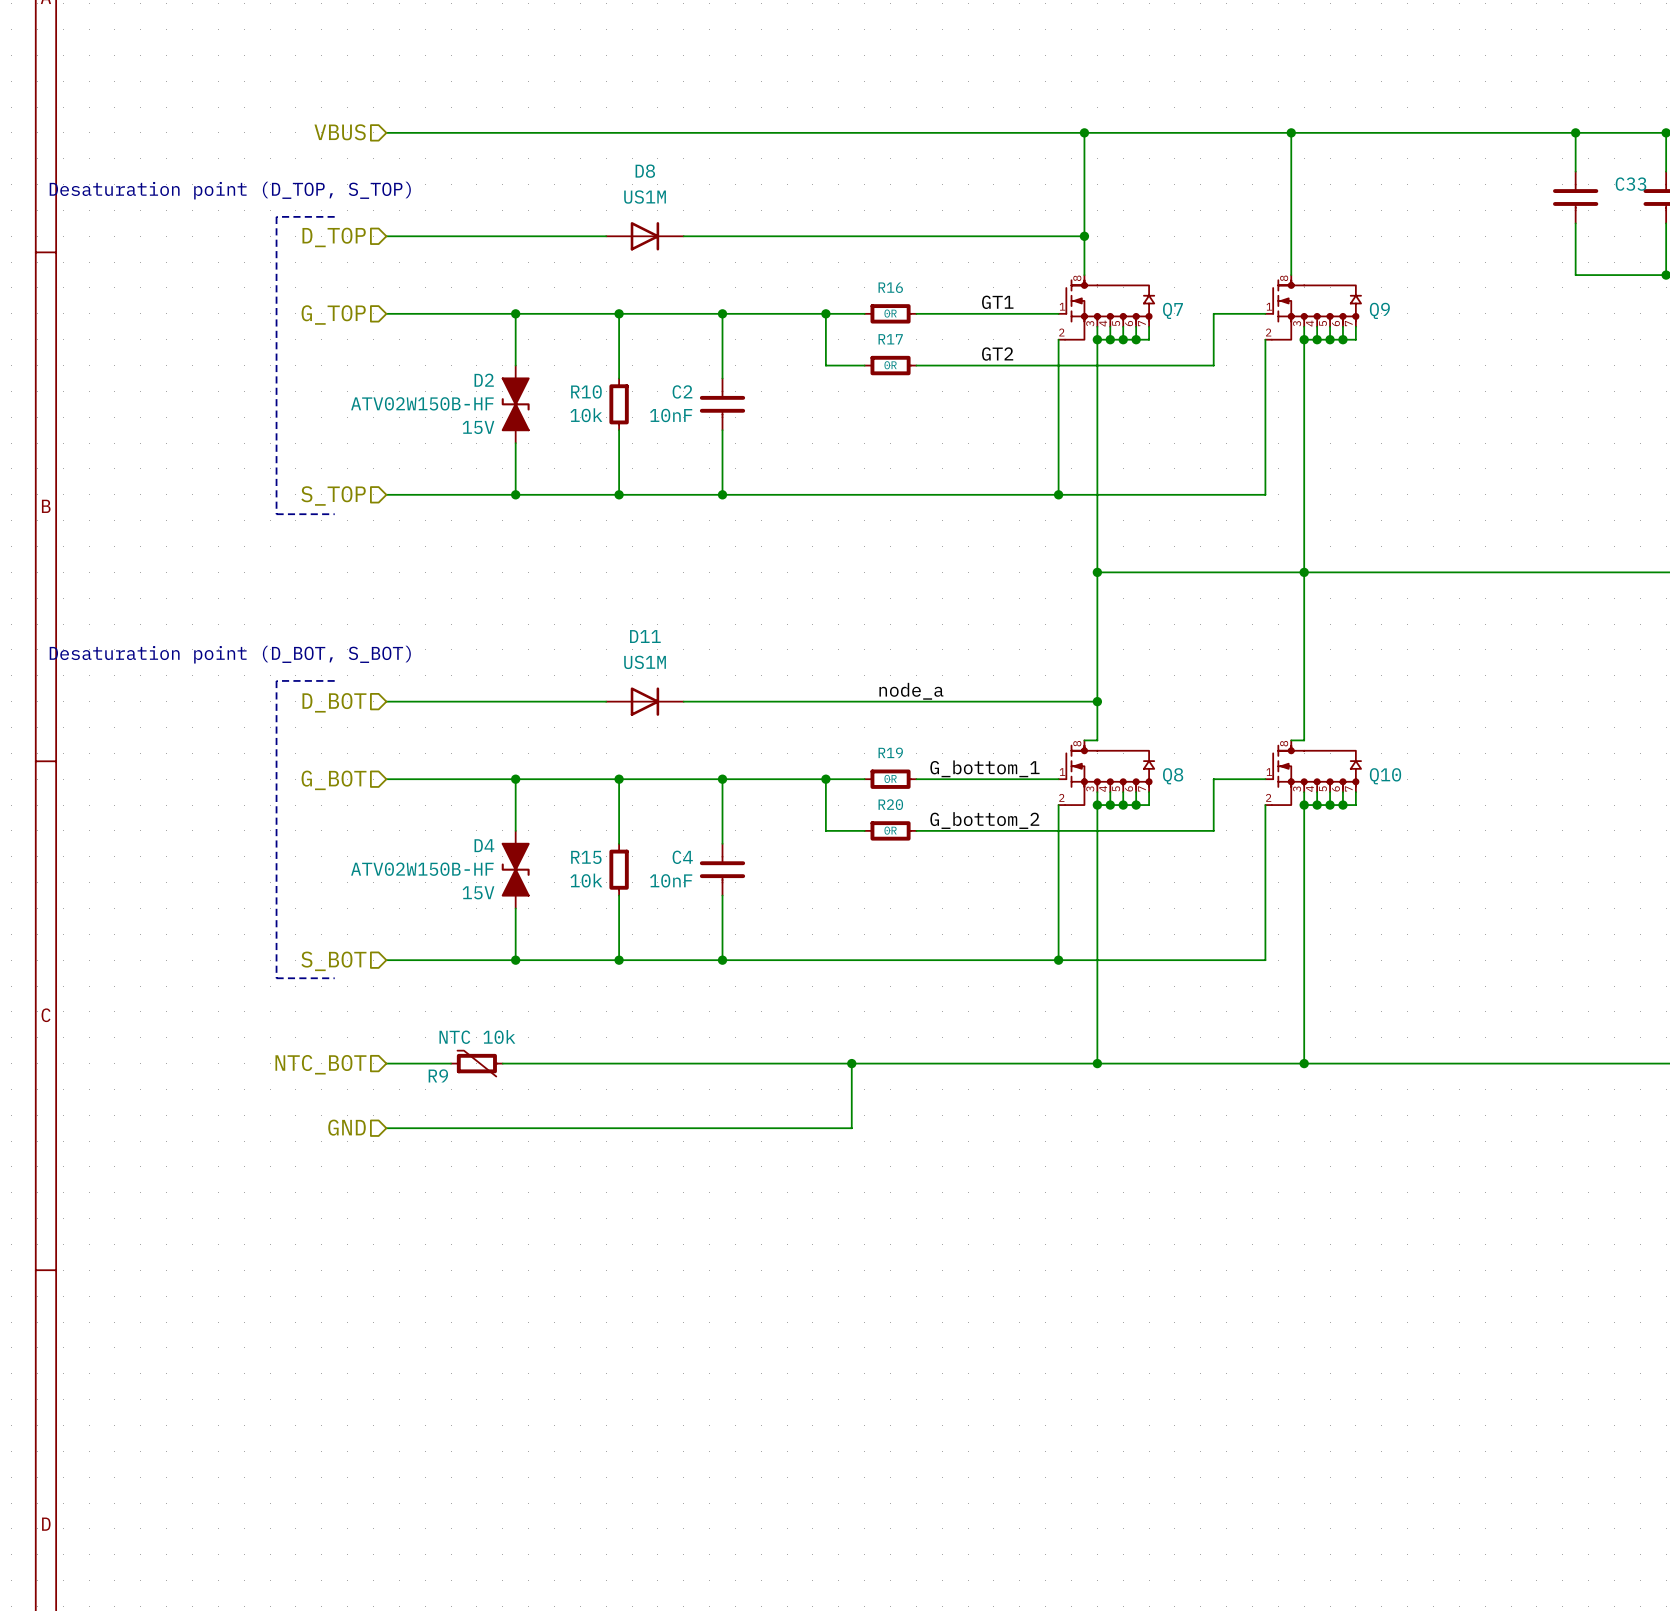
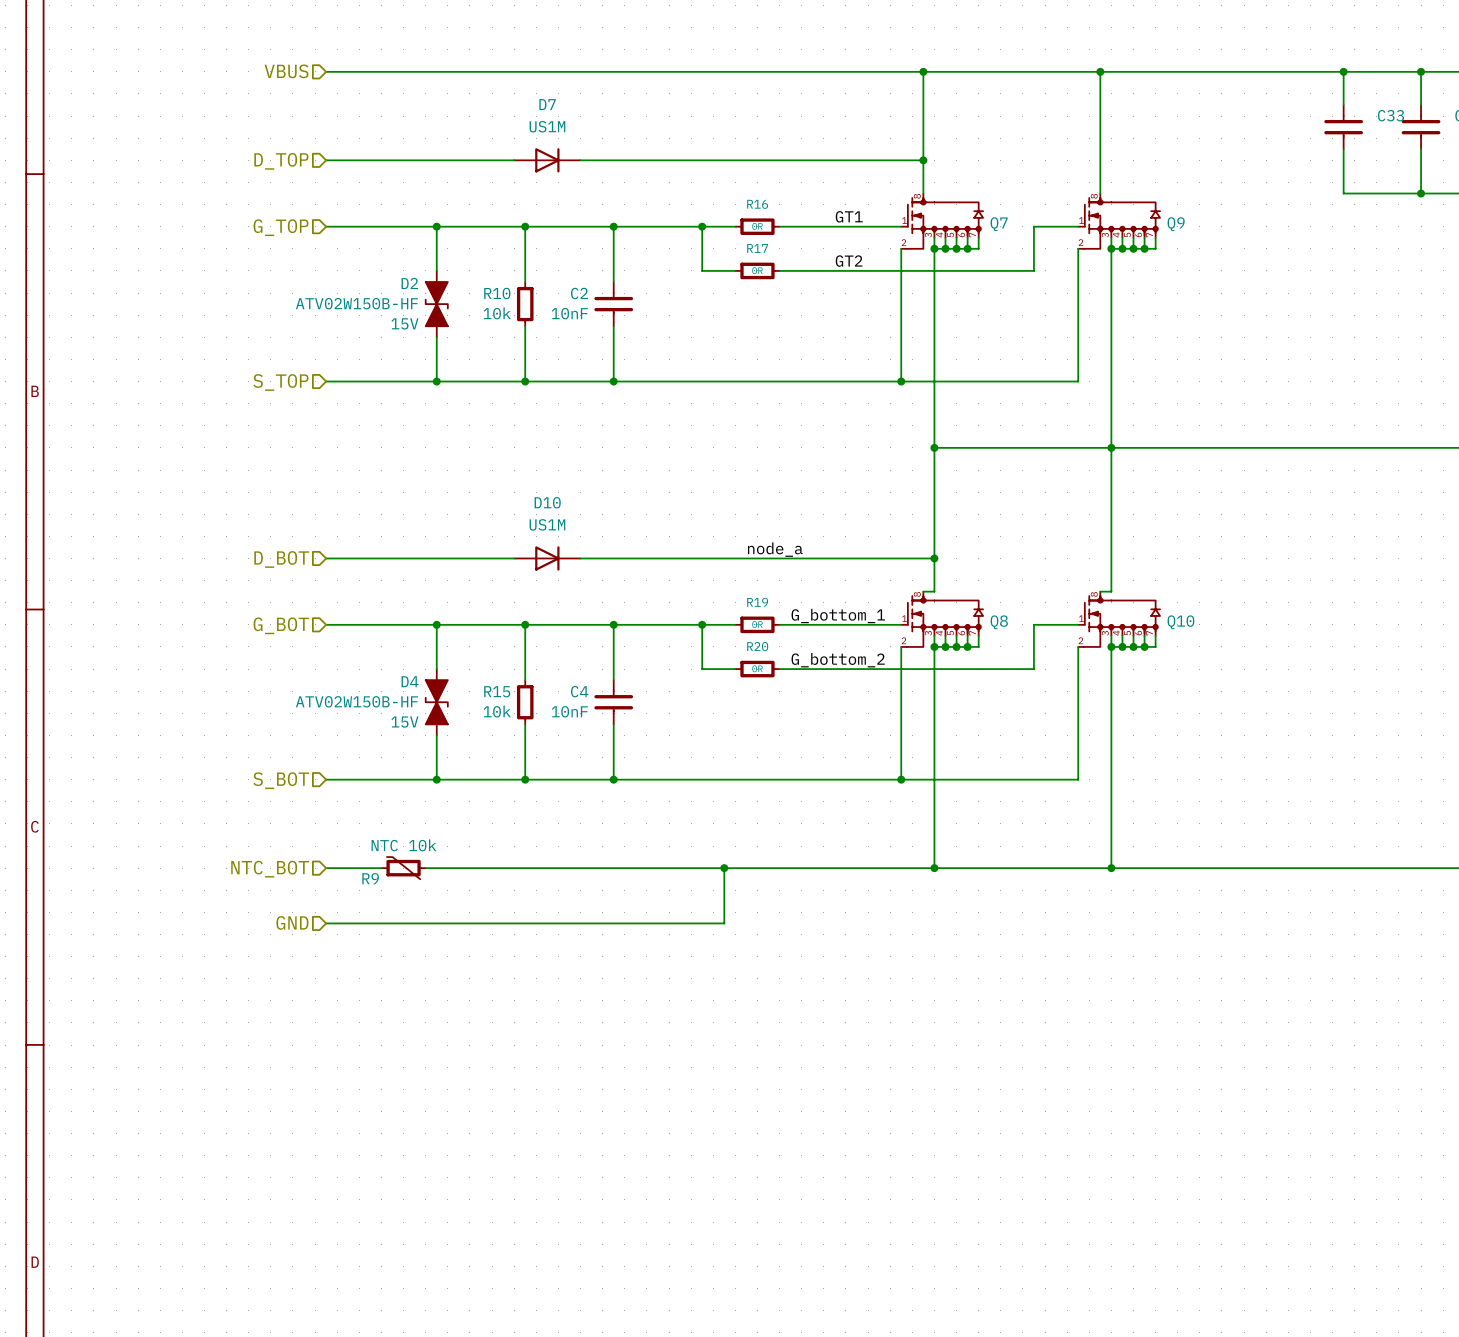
D8 name: D8 (645, 171) -> D7 (547, 104)
text: Desaturation point (D_TOP, S_TOP) (230, 190) -> none
line: (334, 216) (276, 216) (276, 514) (334, 514) -> none
D11 name: D11 (645, 636) -> D10 (547, 502)
text: Desaturation point (D_BOT, S_BOT) (230, 654) -> none
line: (334, 680) (276, 680) (276, 978) (334, 978) -> none

